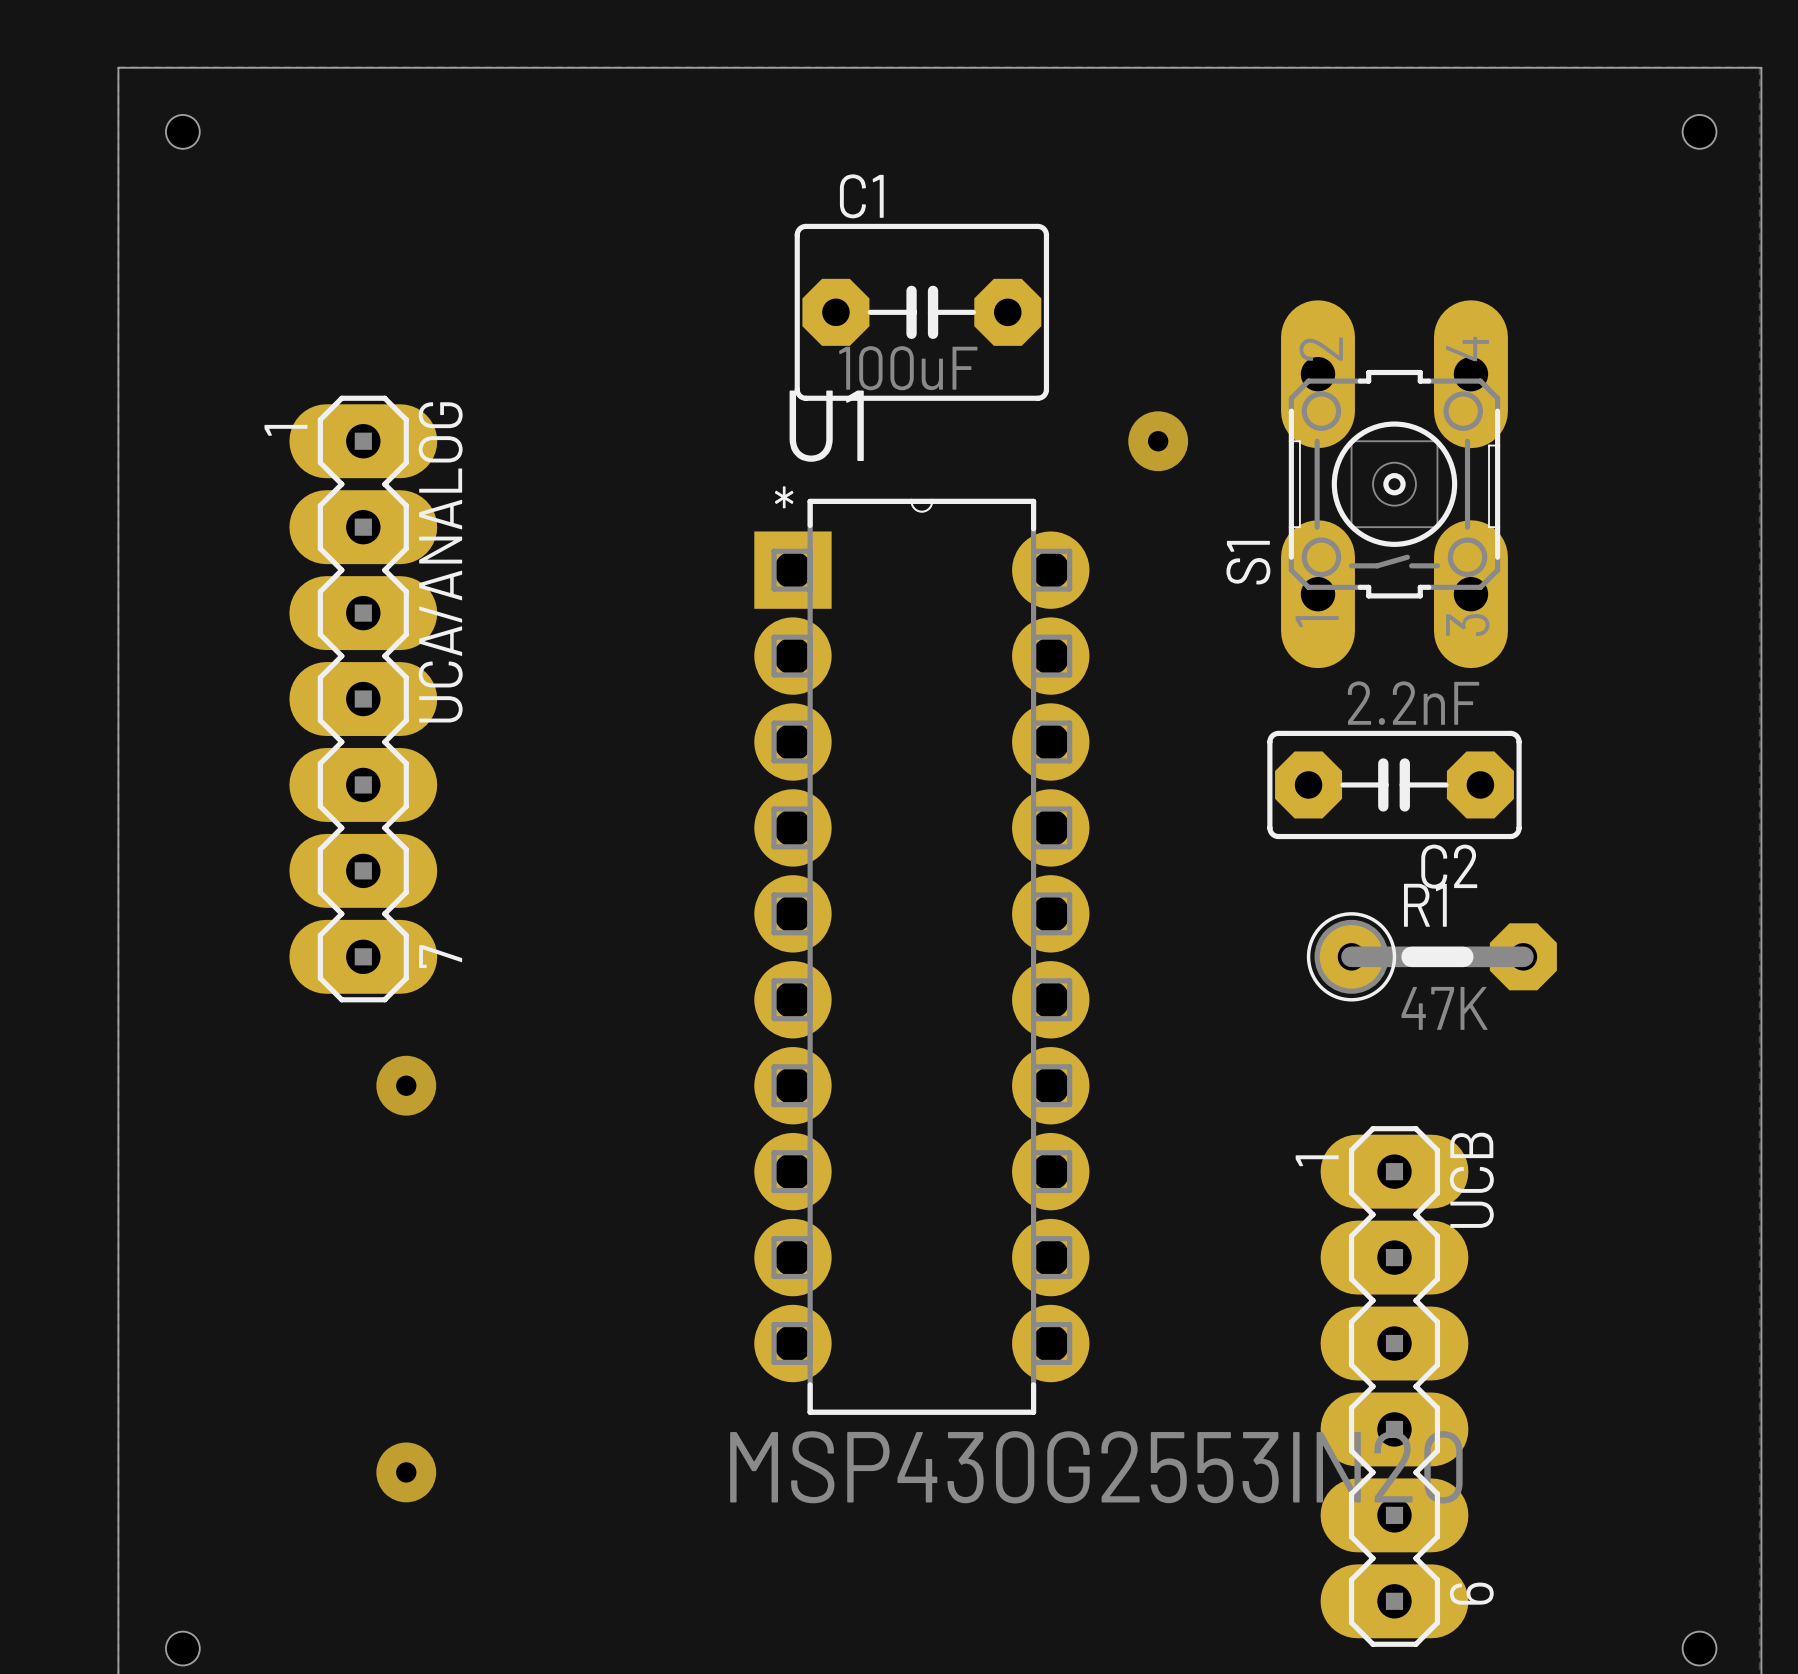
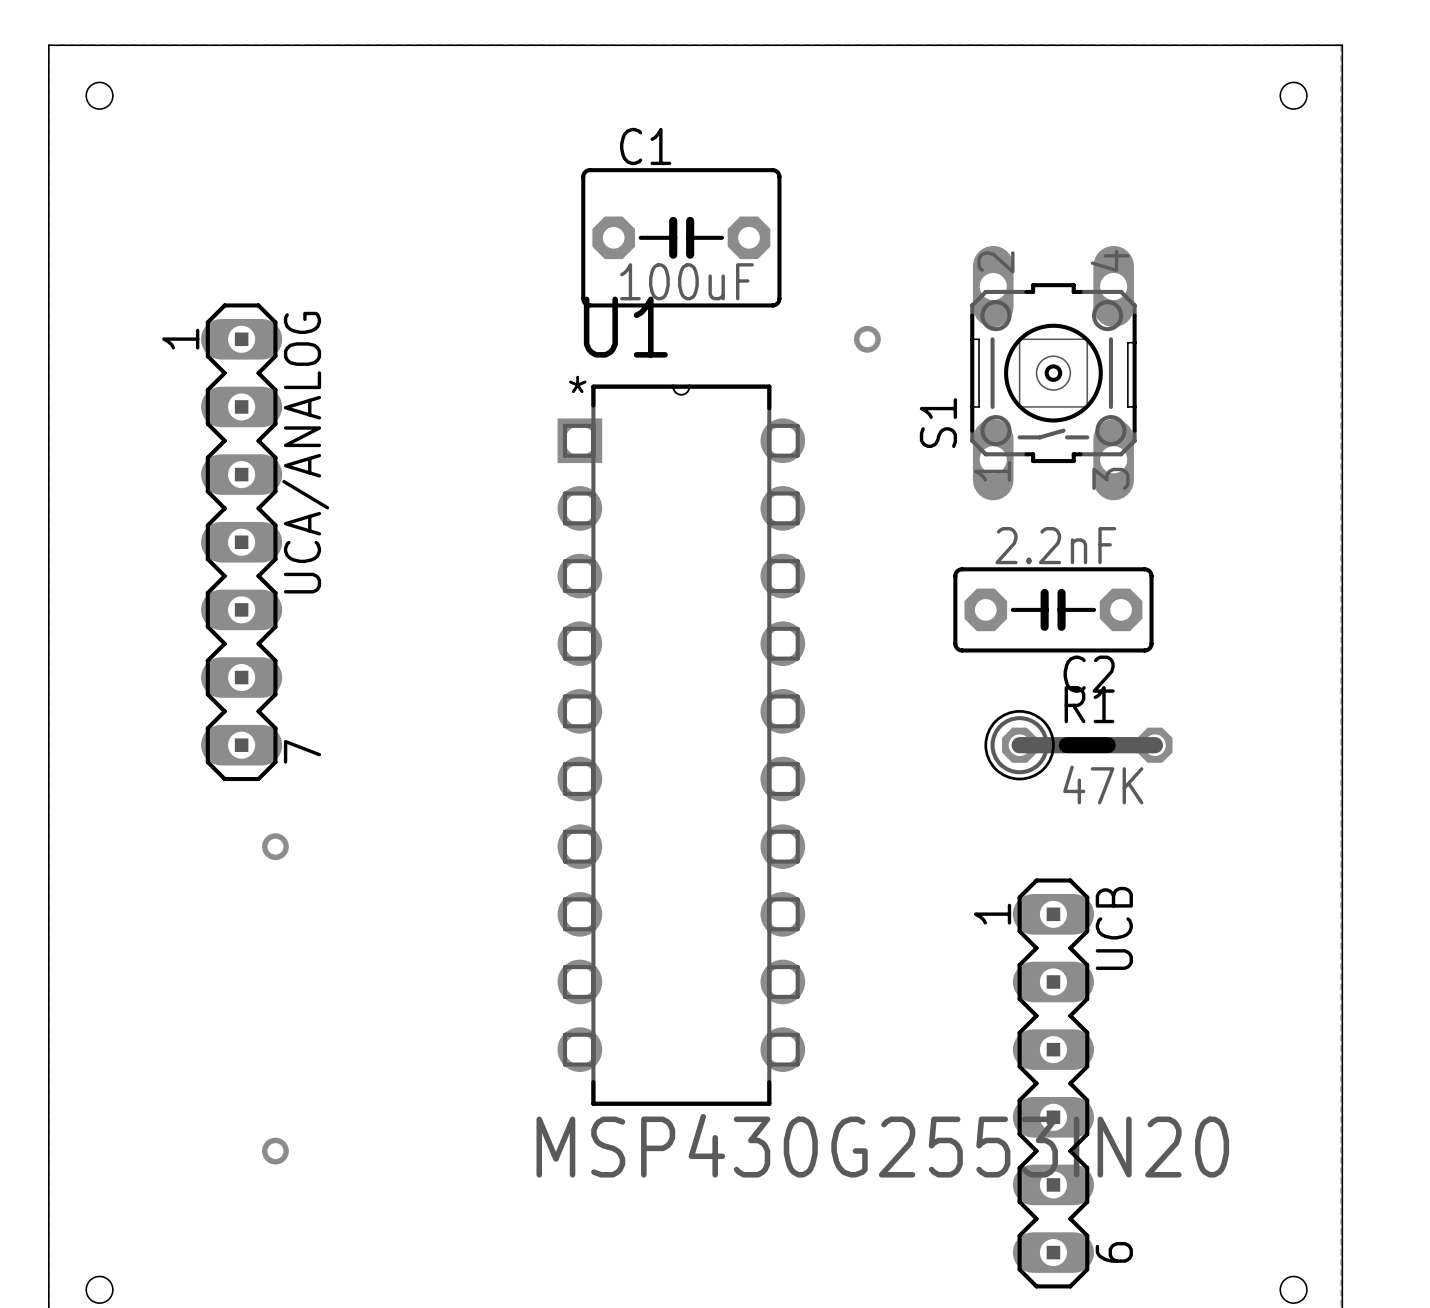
C1 footprint: [794, 223, 1050, 401] -> [581, 168, 782, 308]
S1 footprint: [1281, 300, 1508, 669] -> [970, 245, 1137, 501]
UCA/ANALOG footprint: [289, 395, 438, 1003] -> [201, 303, 283, 782]
via size: [1128, 411, 1189, 472] -> [853, 325, 881, 353]
U1 footprint: [754, 498, 1090, 1415] -> [557, 384, 806, 1106]
C2 footprint: [1267, 730, 1522, 840] -> [953, 567, 1154, 653]
R1 footprint: [1306, 912, 1557, 1002] -> [984, 710, 1173, 781]
via size: [376, 1055, 437, 1116] -> [262, 833, 289, 861]
UCB footprint: [1320, 1126, 1469, 1647] -> [1012, 878, 1095, 1289]
via size: [376, 1442, 437, 1503] -> [262, 1137, 289, 1165]

